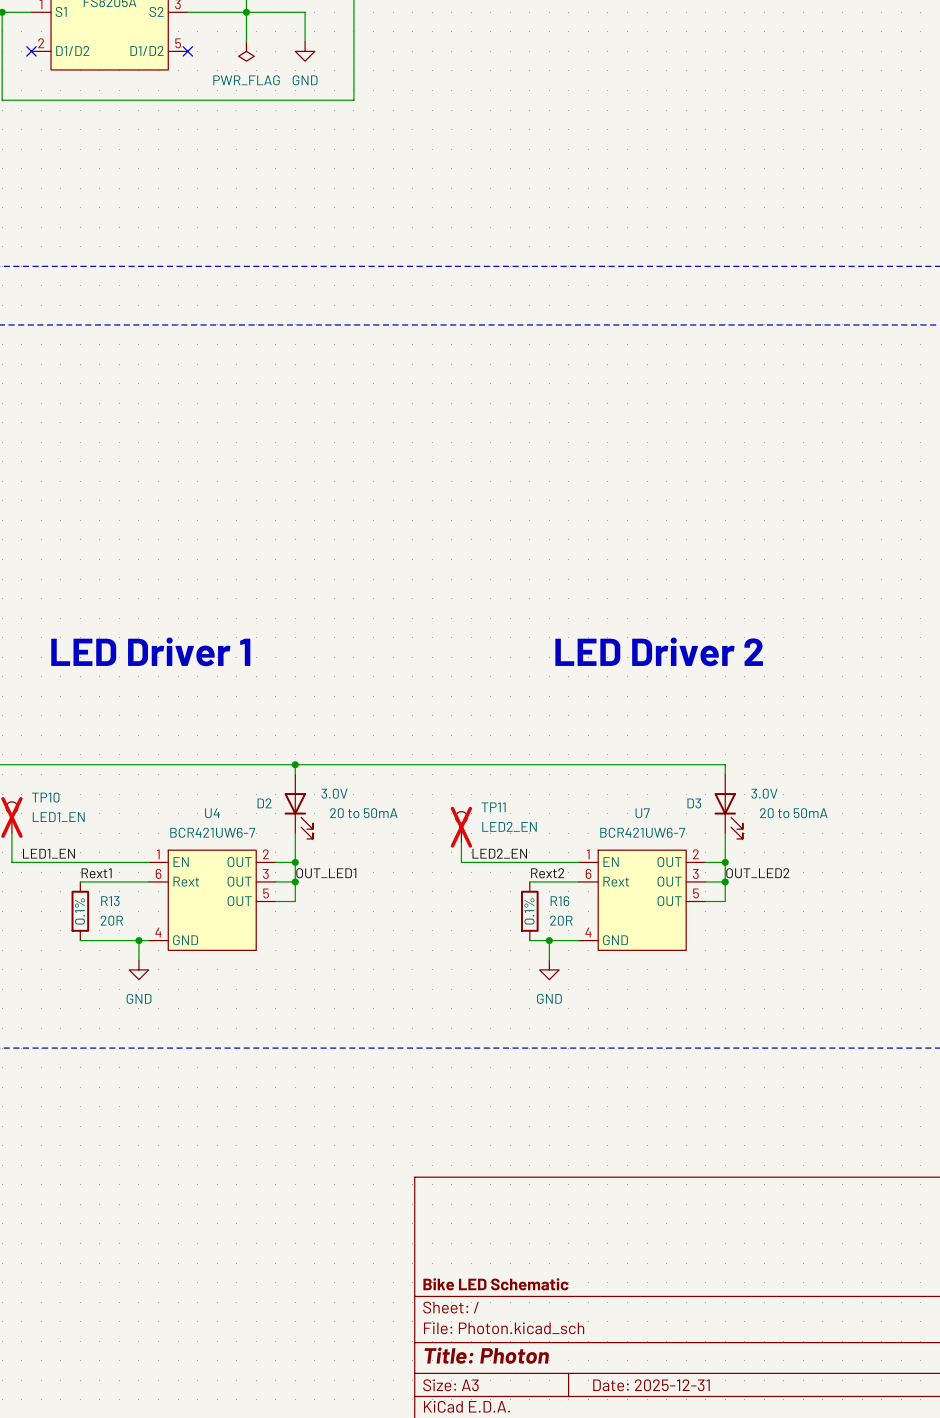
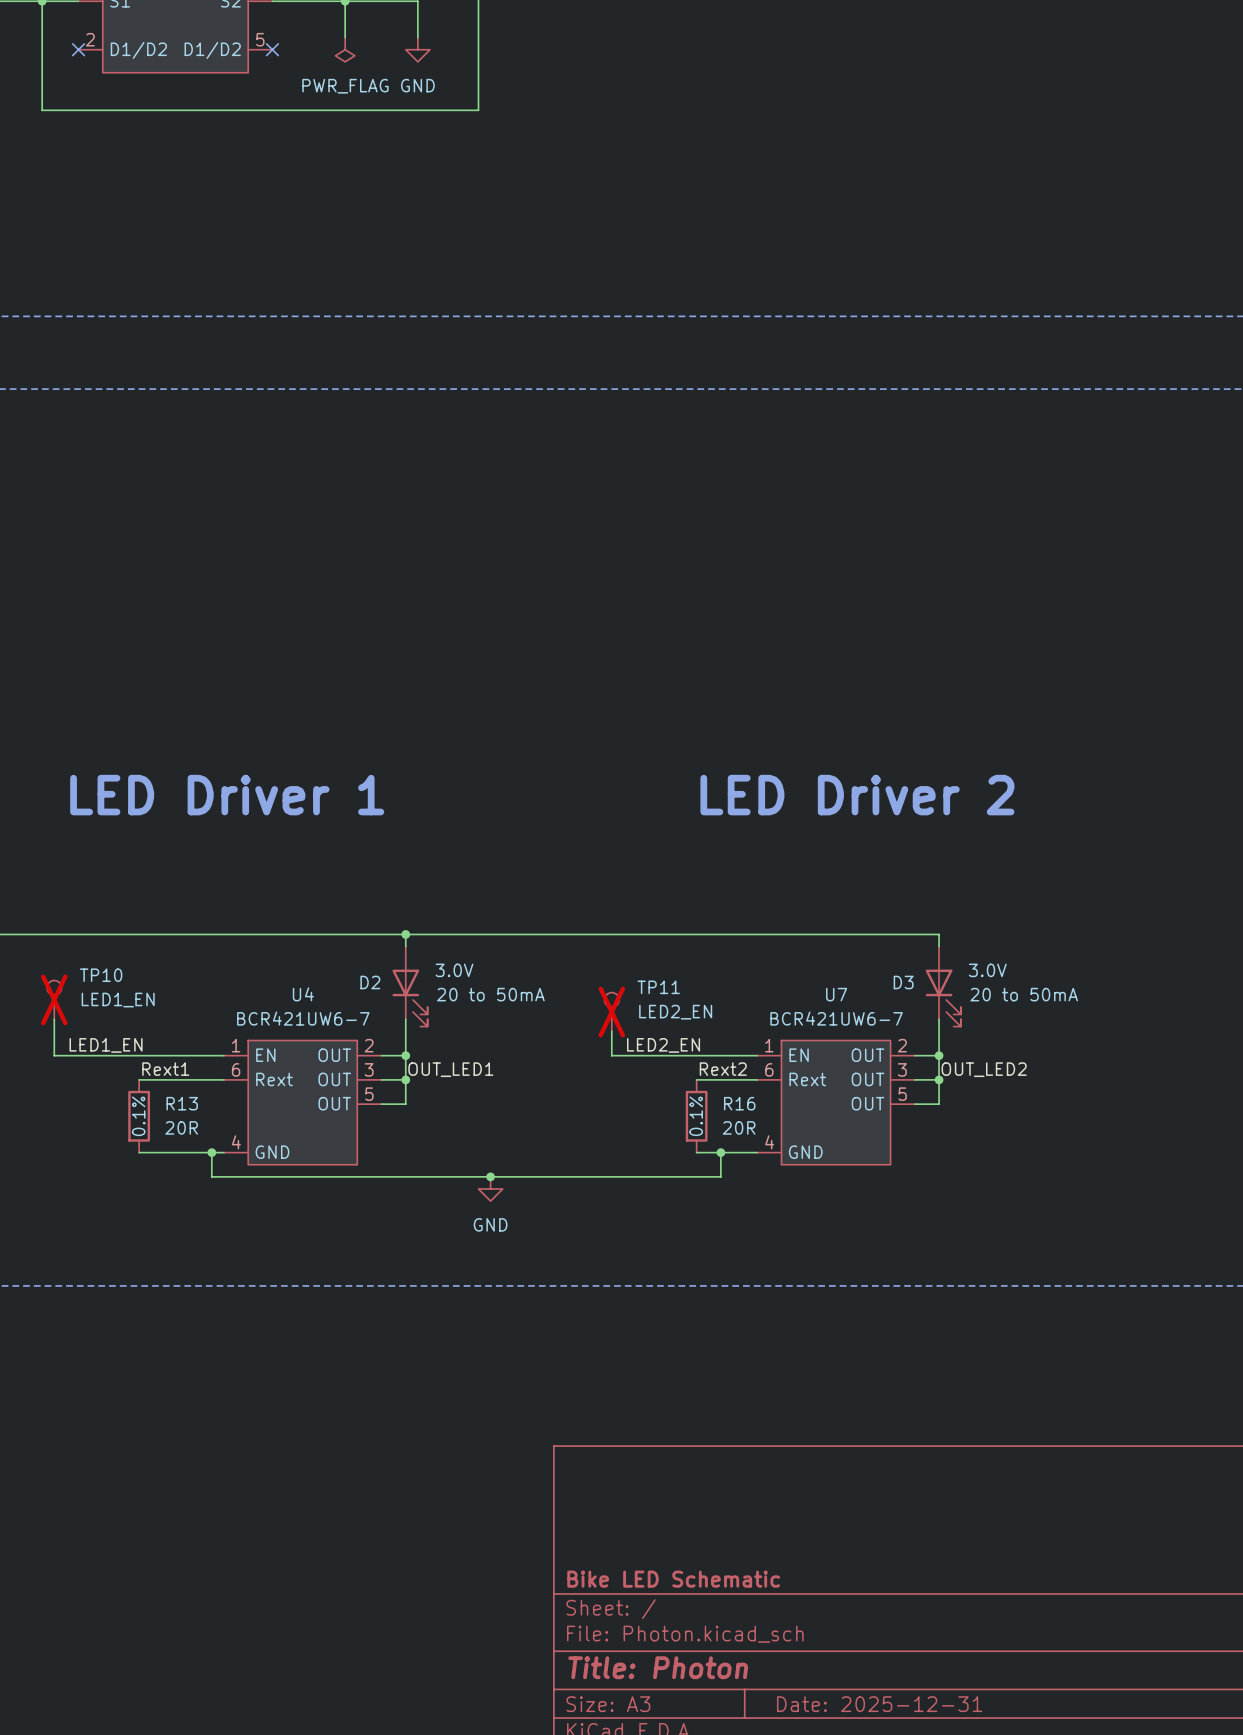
wire: none -> (211, 1176) (720, 1176)
junction: none -> (490, 1176)
power symbol: GND (138, 969) -> none
power symbol: none -> GND (490, 1188)
power symbol: GND (549, 969) -> none

